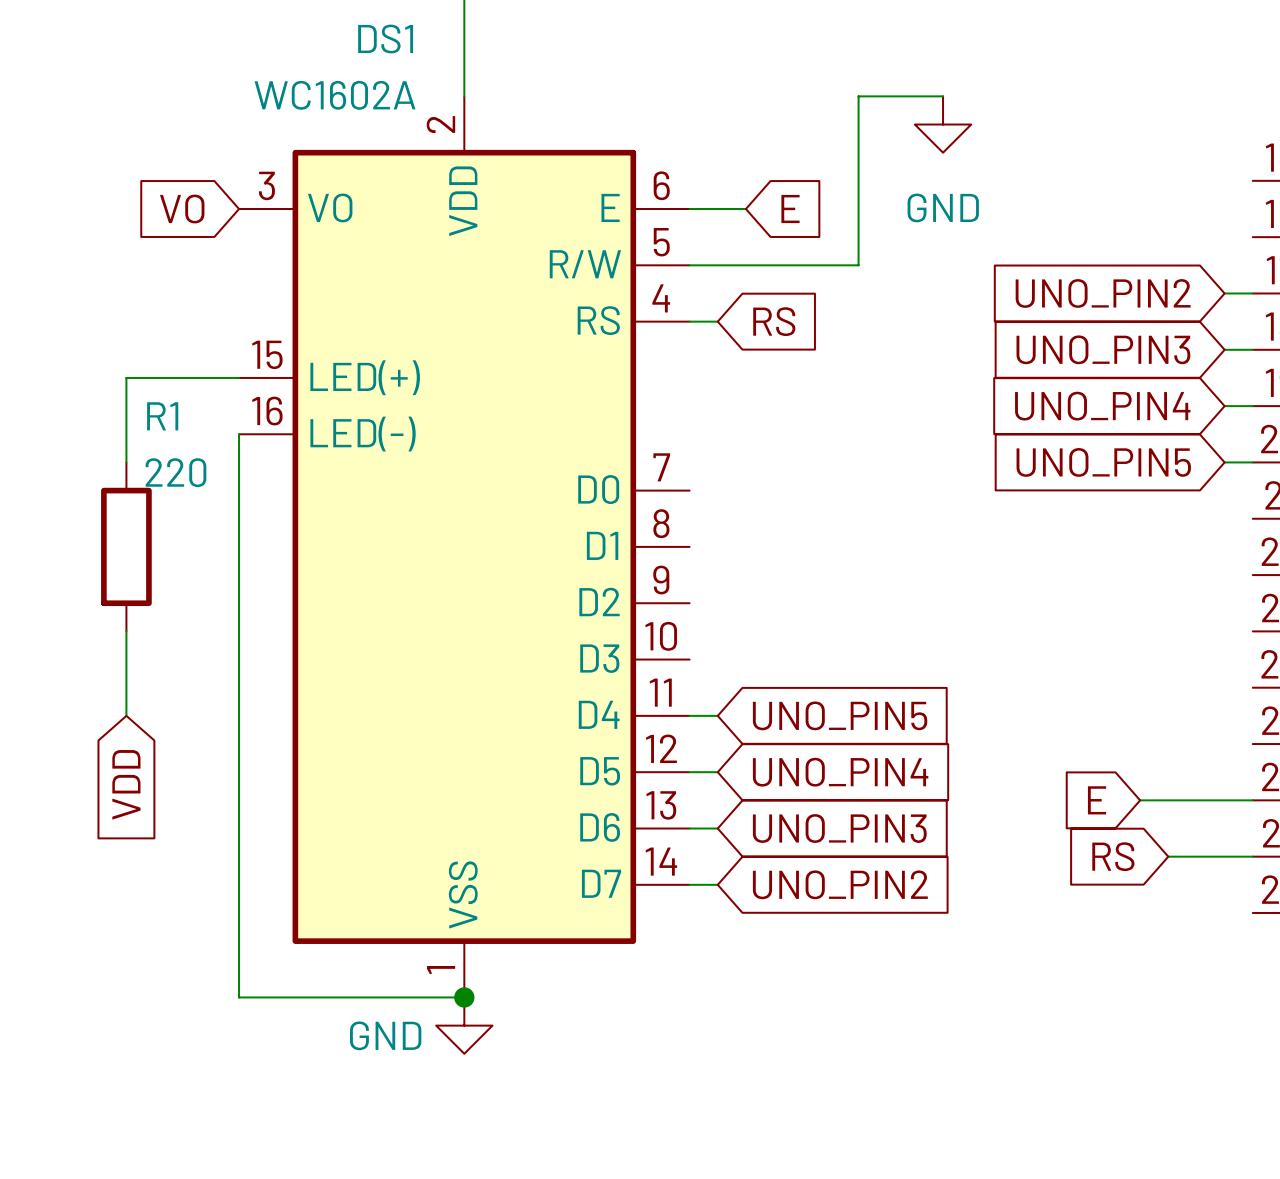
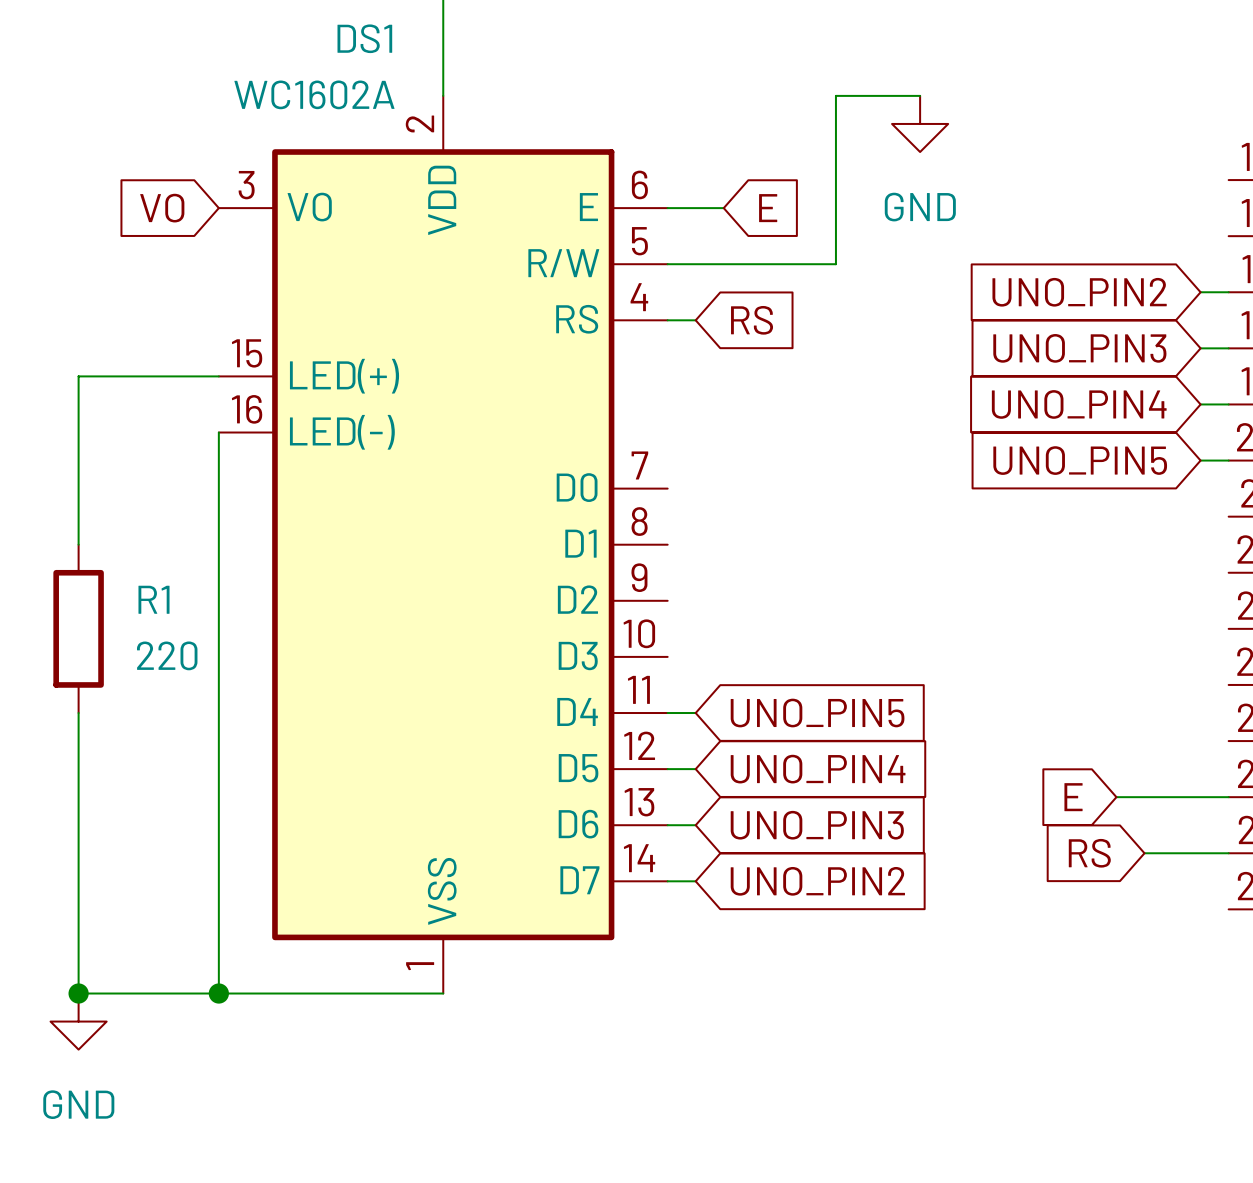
wire: (126, 377) (126, 462) -> (106, 376) (78, 376) (78, 544)
R1 name position: R1 (162, 416) -> R1 (154, 599)
R1 value position: 220 (175, 472) -> 220 (167, 655)
R1 position: (126, 546) -> (78, 628)
wire: (126, 631) (126, 715) -> none
wire: none -> (78, 713) (78, 993) (218, 993)
global label: VDD (126, 784) -> none
junction: none -> (78, 993)
junction: none -> (218, 993)
junction: (464, 997) -> none
power symbol position: GND (464, 1025) -> GND (78, 1021)
power symbol text position: GND (385, 1035) -> GND (78, 1104)

